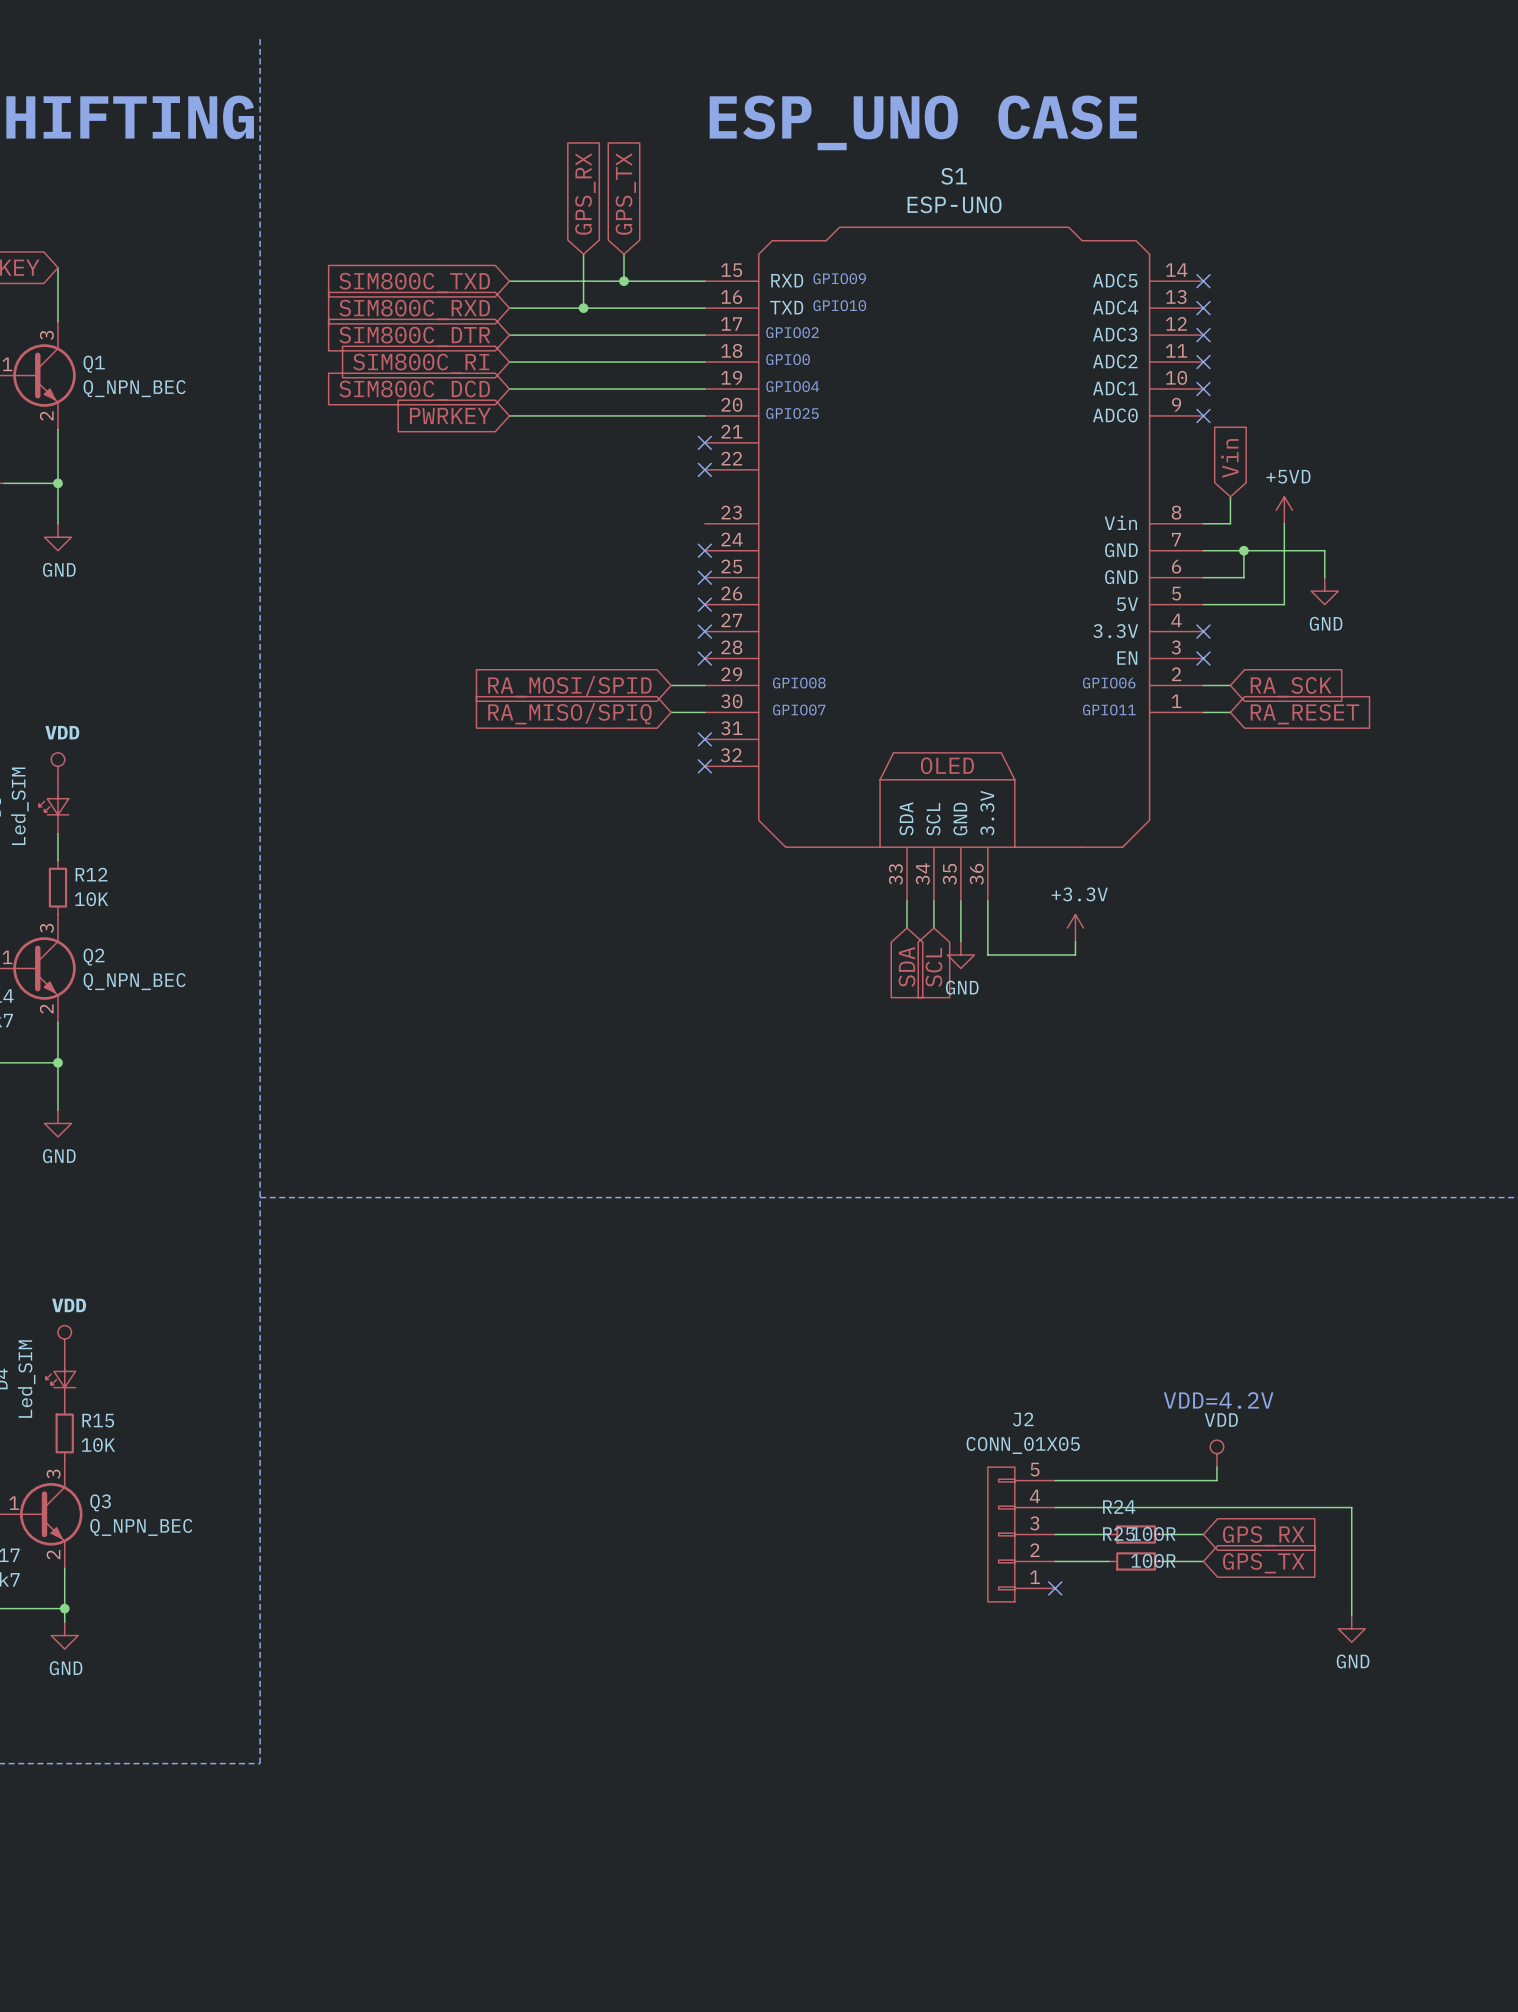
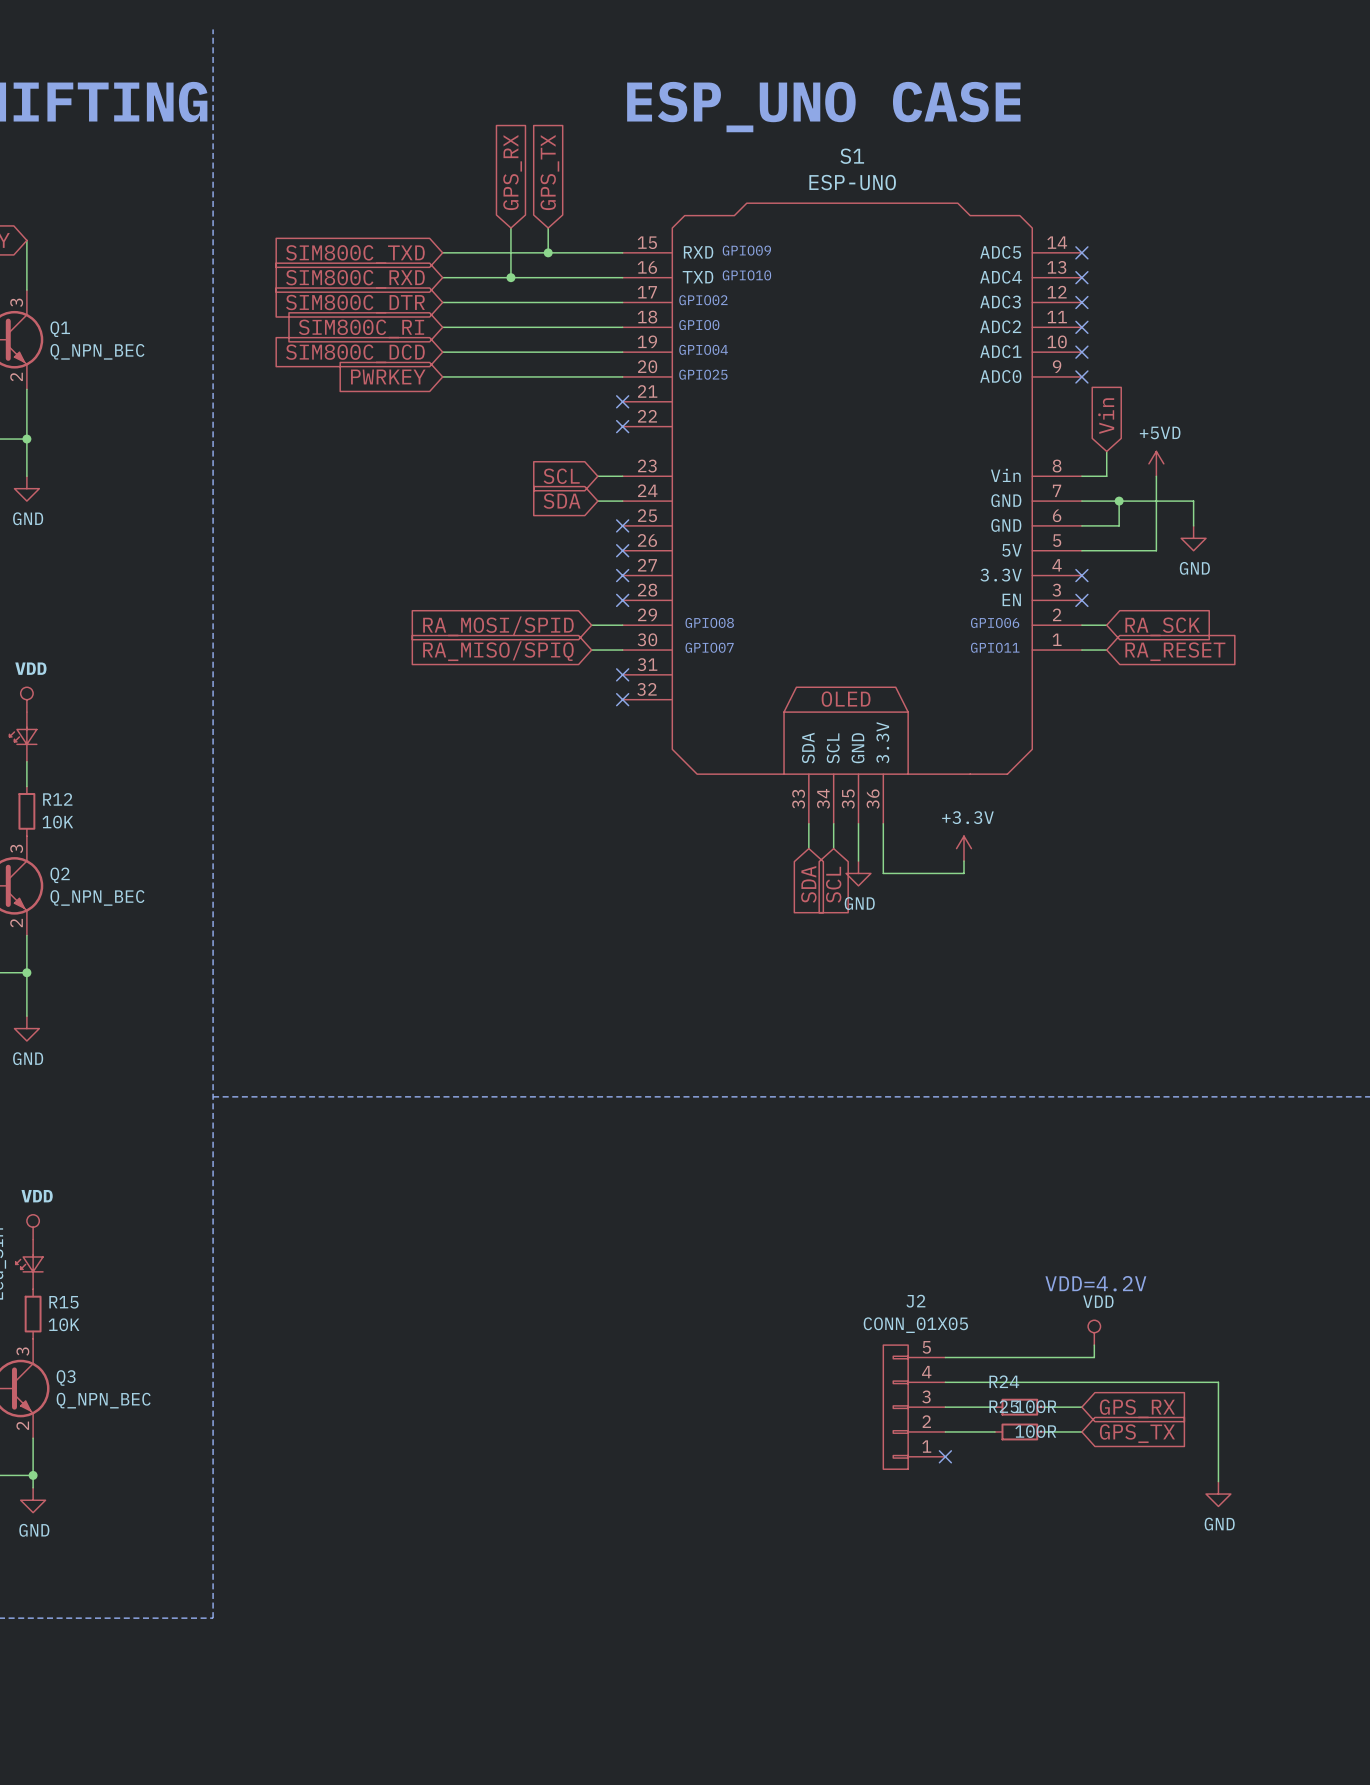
global label: none -> SCL (561, 476)
wire: none -> (597, 476) (622, 476)
global label: none -> SDA (562, 501)
wire: none -> (597, 501) (622, 501)
no-connect mark: (704, 550) -> none

